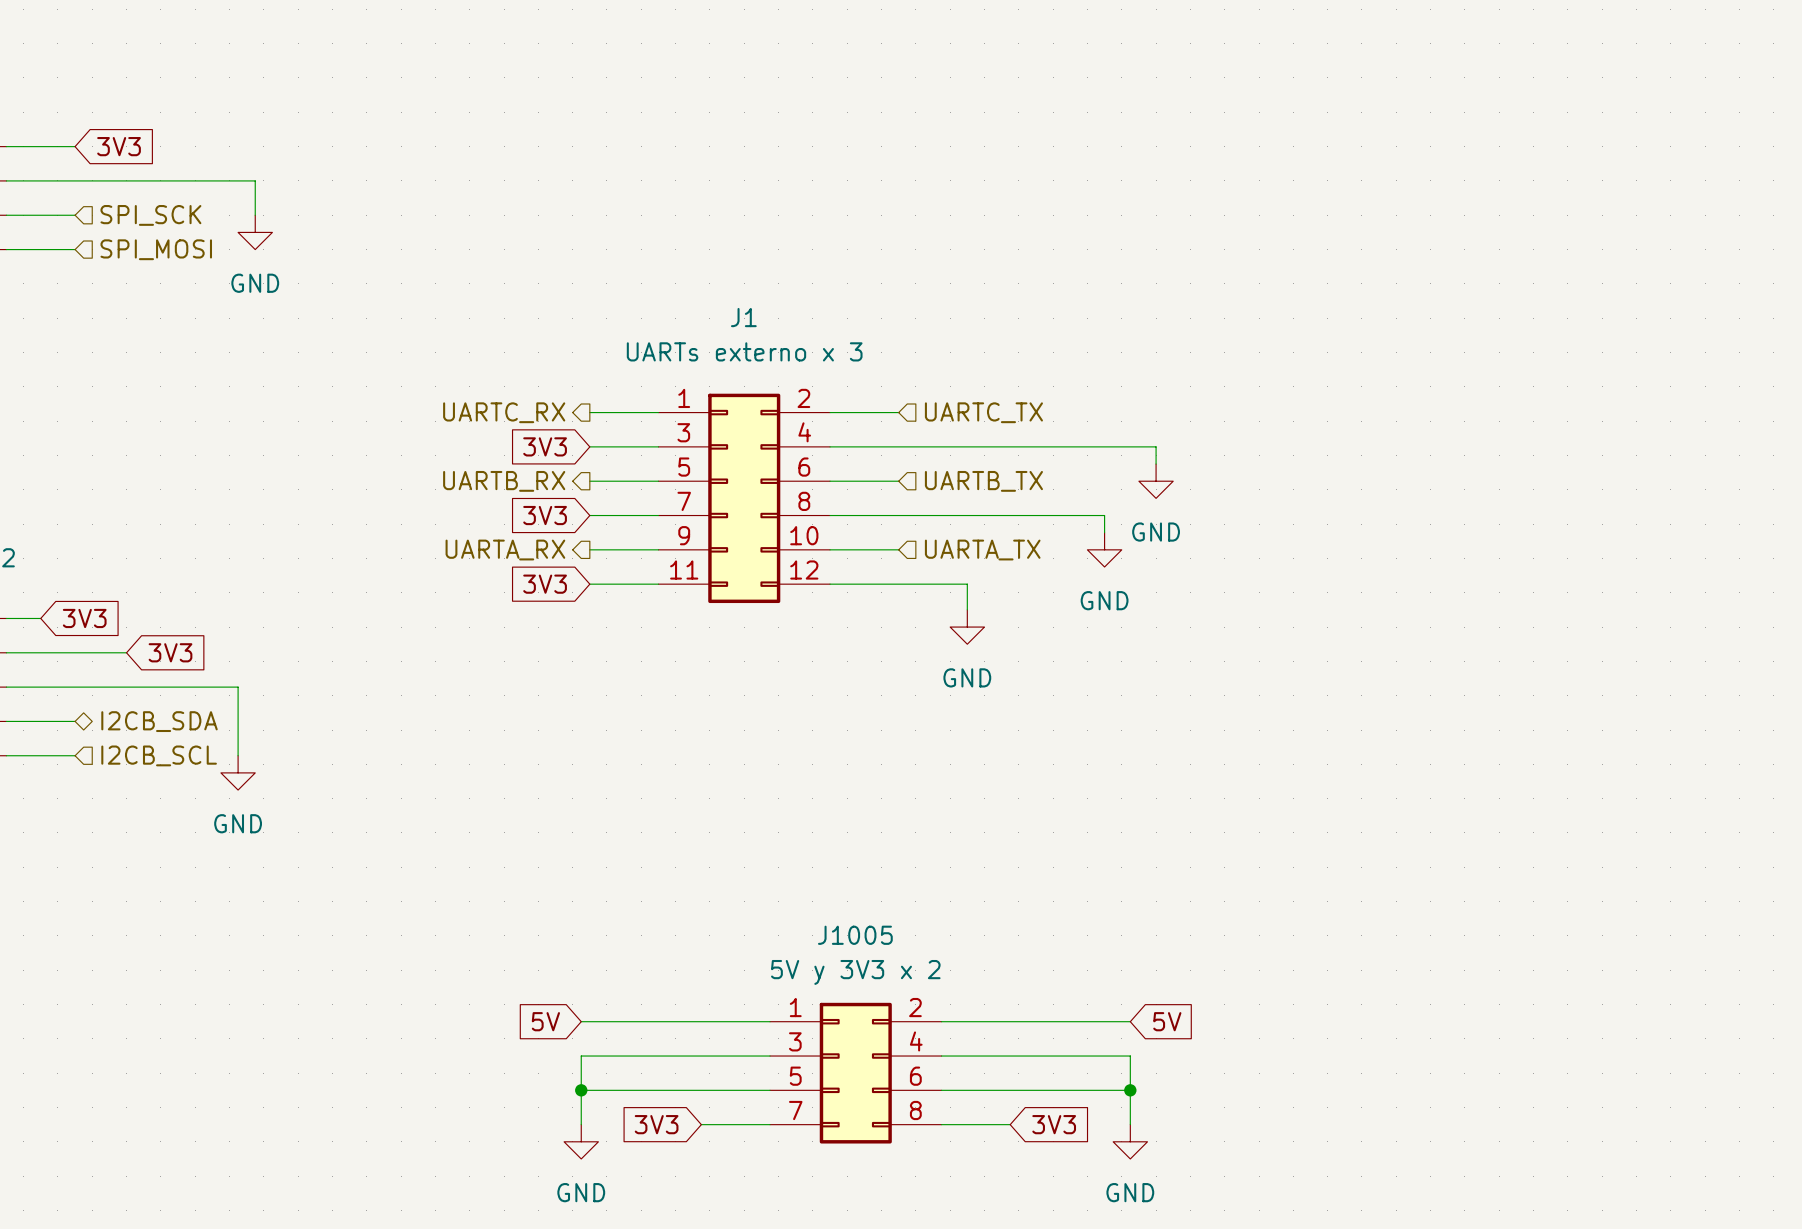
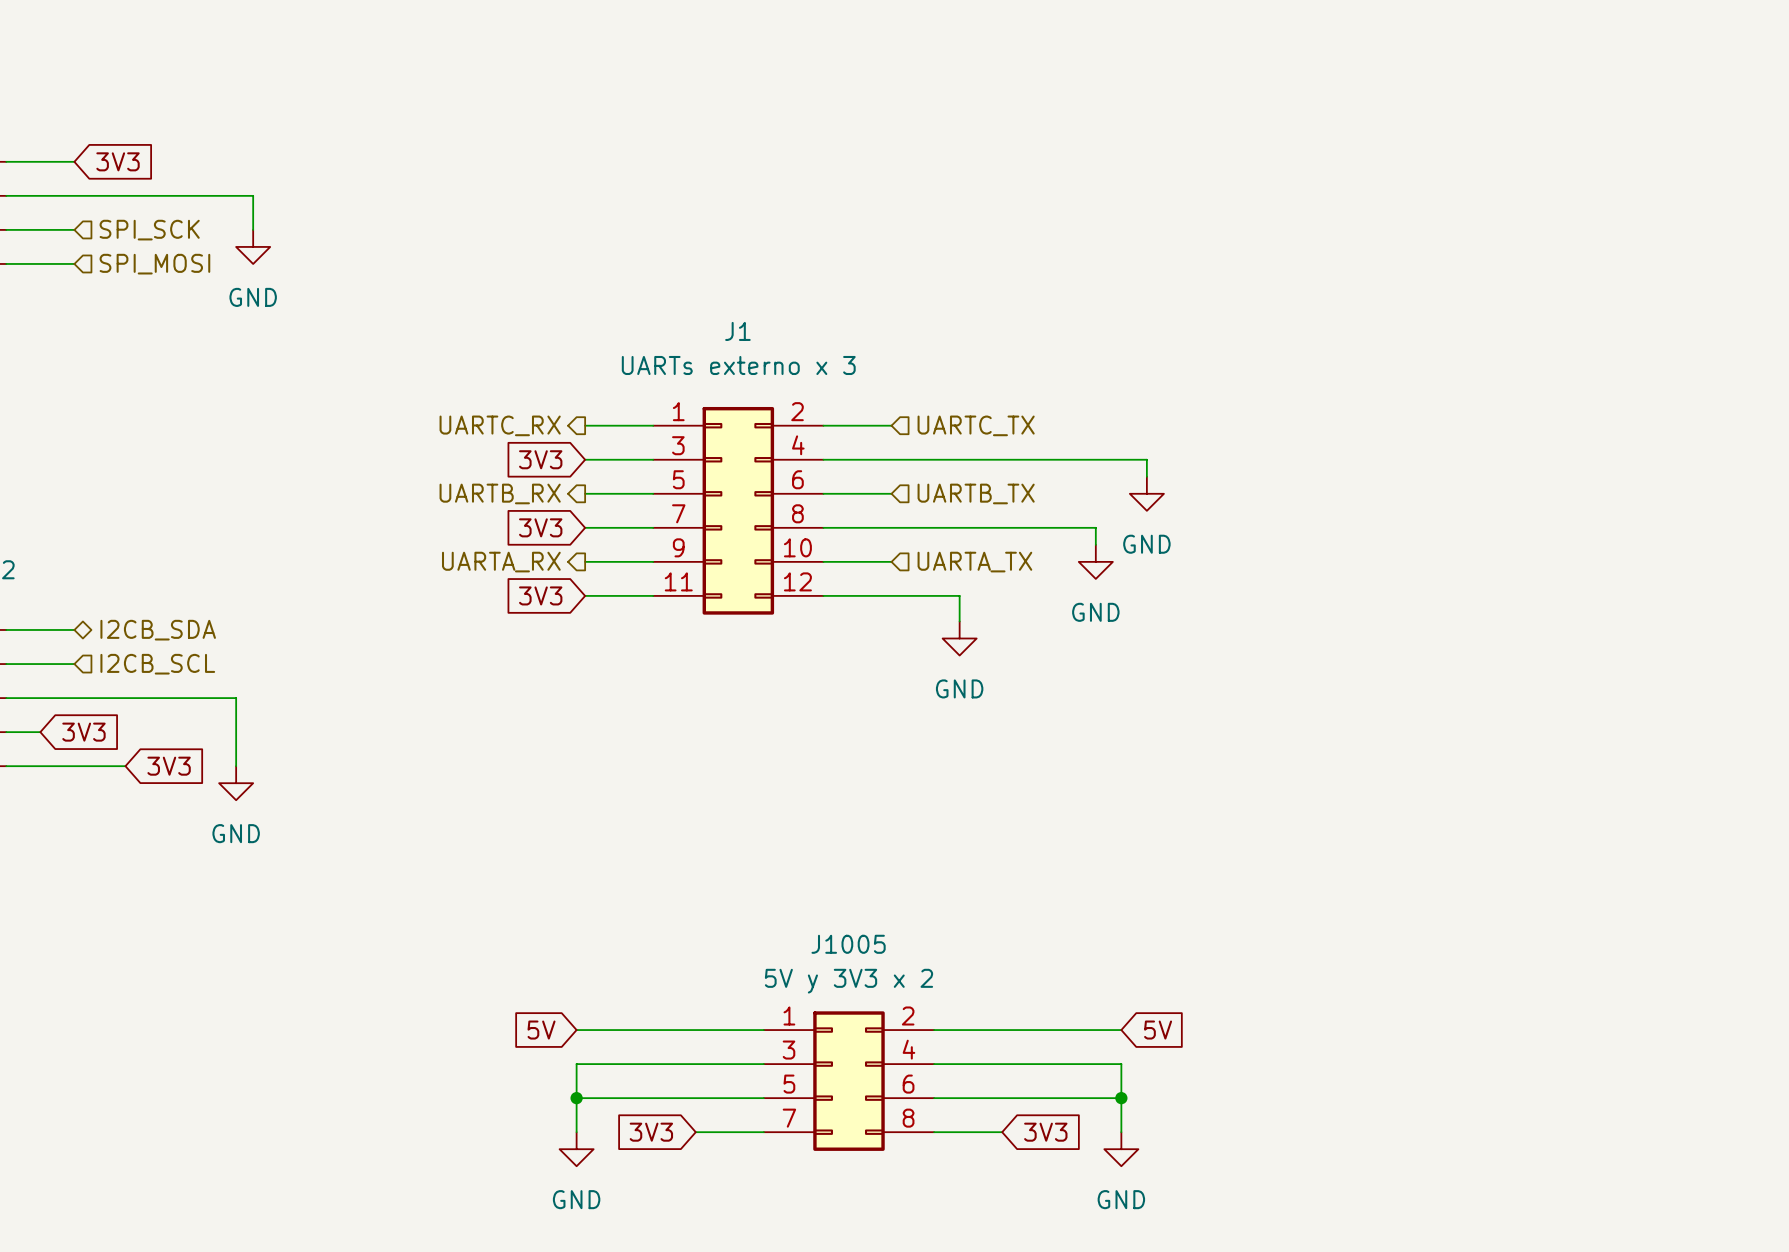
global label: 3V3 (84, 618) -> none
wire: (75, 652) (126, 652) -> (74, 766) (125, 766)
global label: 3V3 (170, 652) -> none
wire: (40, 721) (75, 721) -> (40, 629) (74, 629)
global label: none -> 3V3 (83, 732)
hierarchical label position: I2CB_SDA (159, 721) -> I2CB_SDA (158, 630)
hierarchical label position: I2CB_SCL (159, 755) -> I2CB_SCL (157, 664)
global label: none -> 3V3 (169, 766)

